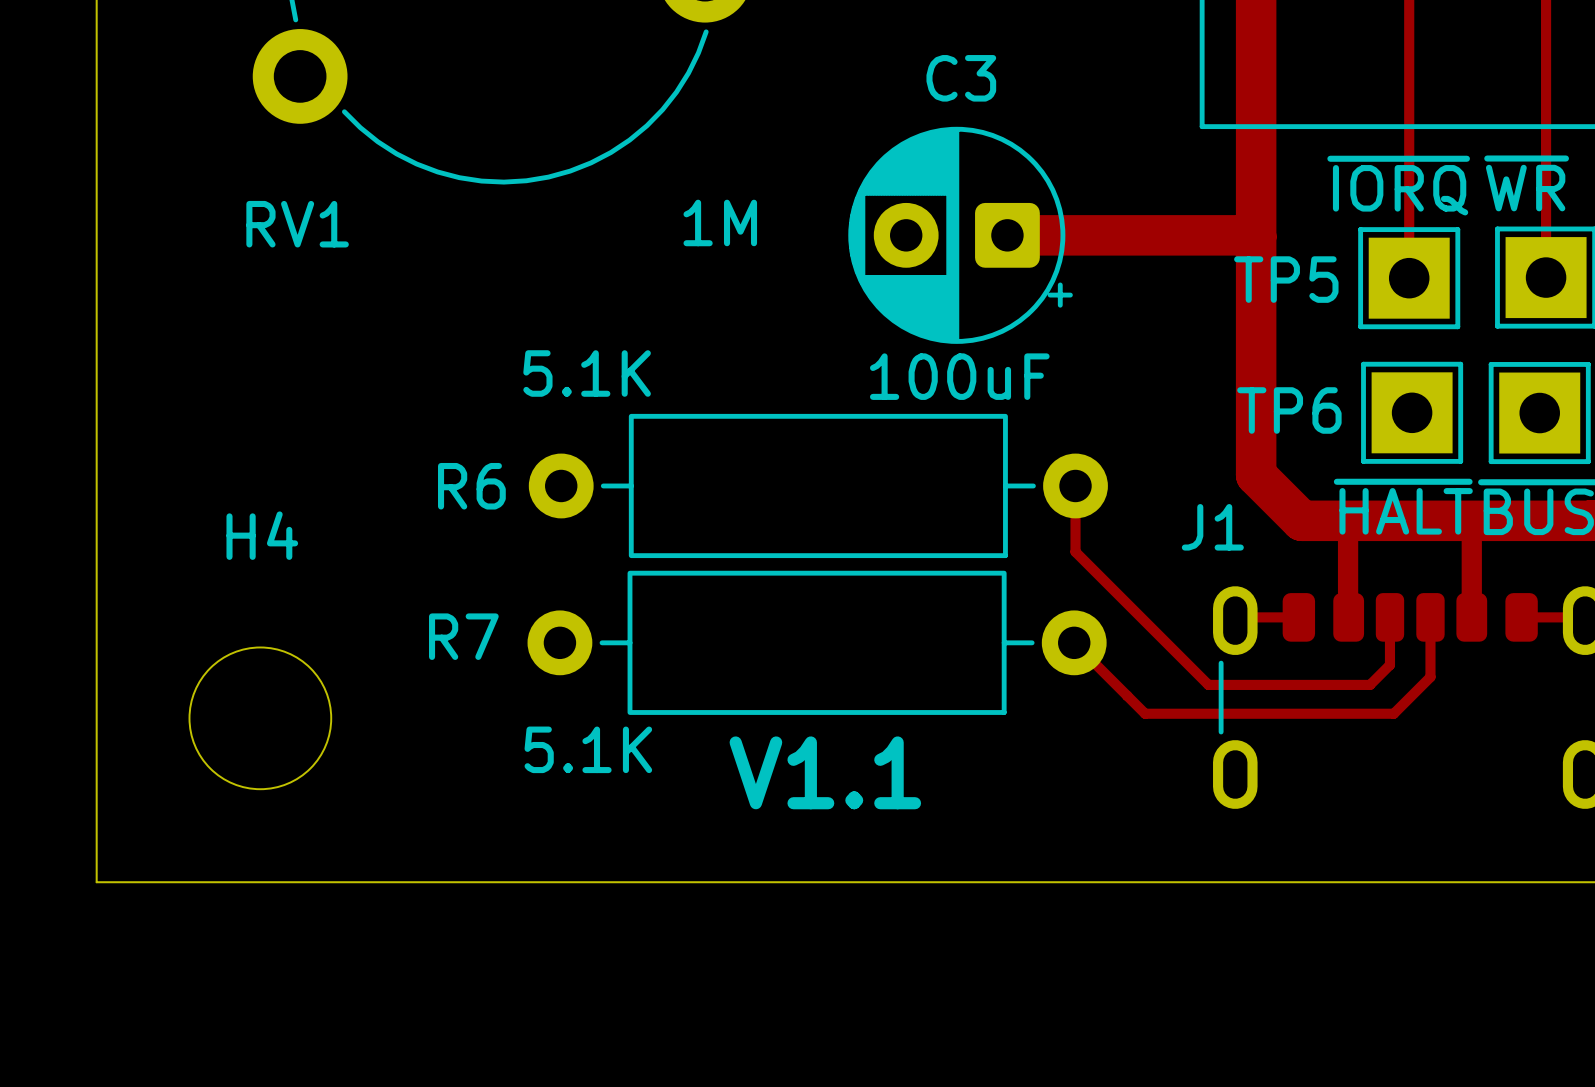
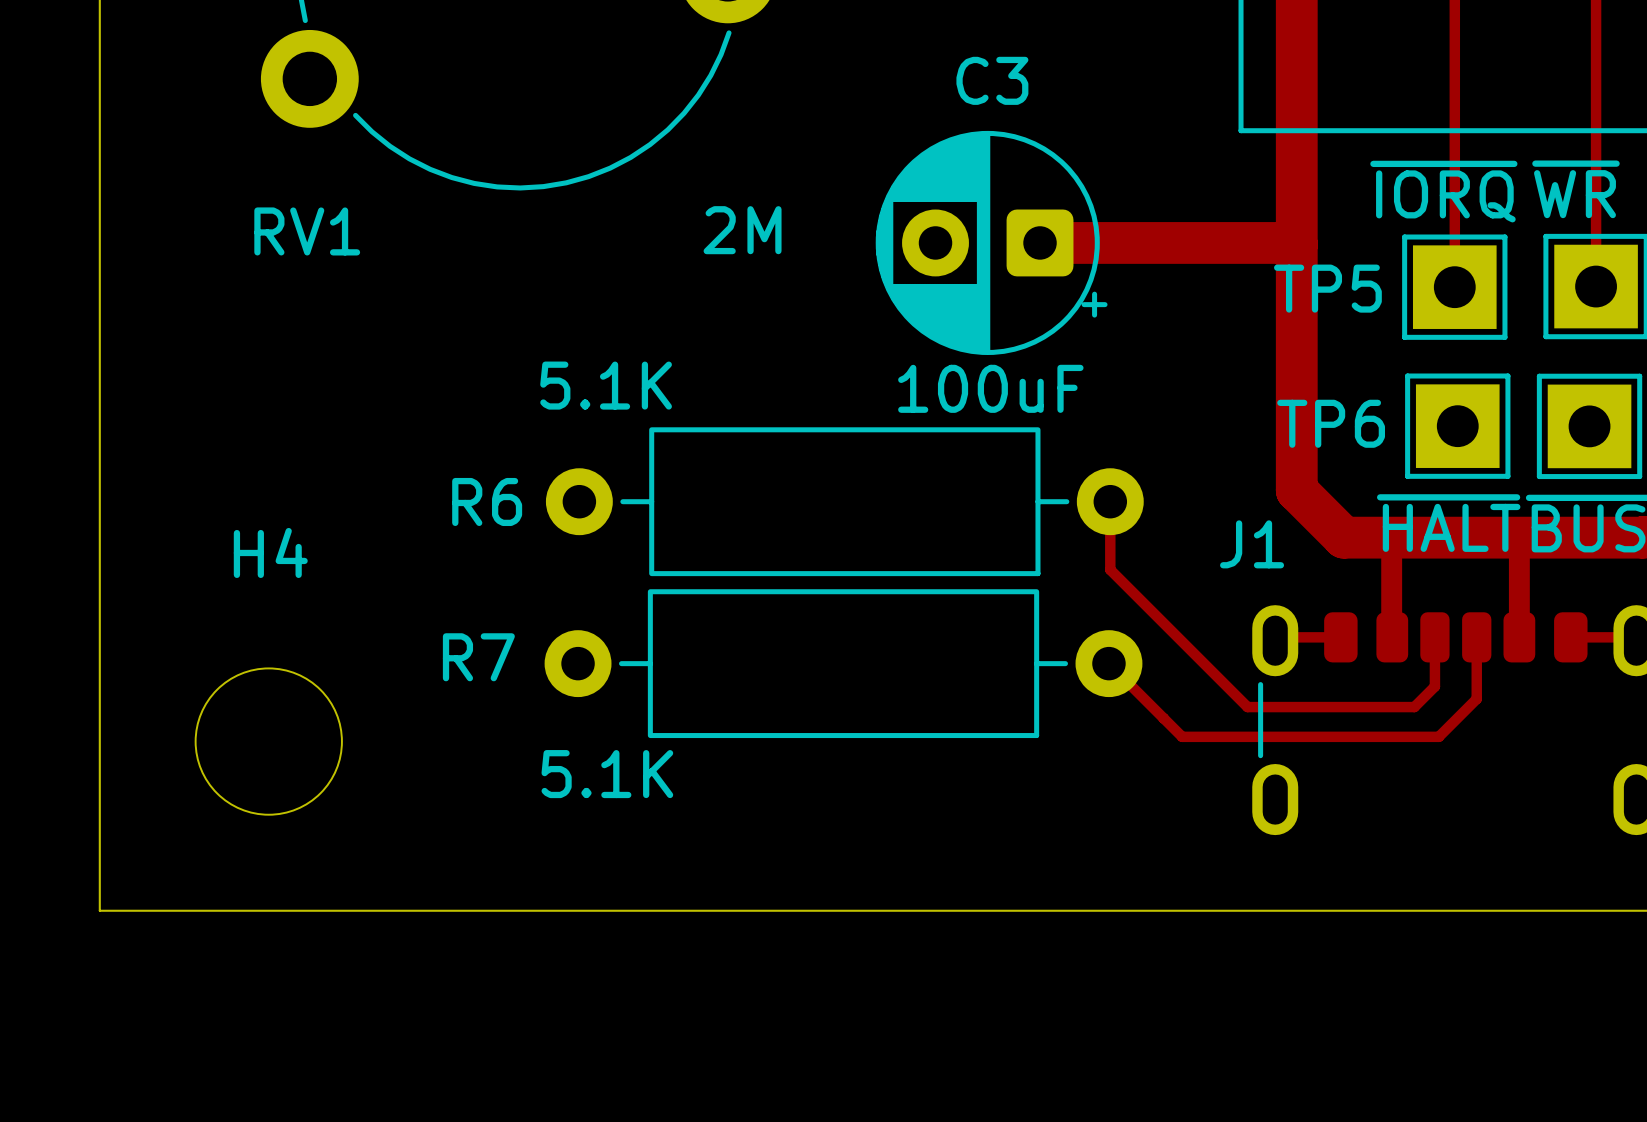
RV1 value: 1M (720, 222) -> 2M (742, 230)
text: V1.1 (825, 772) -> none

